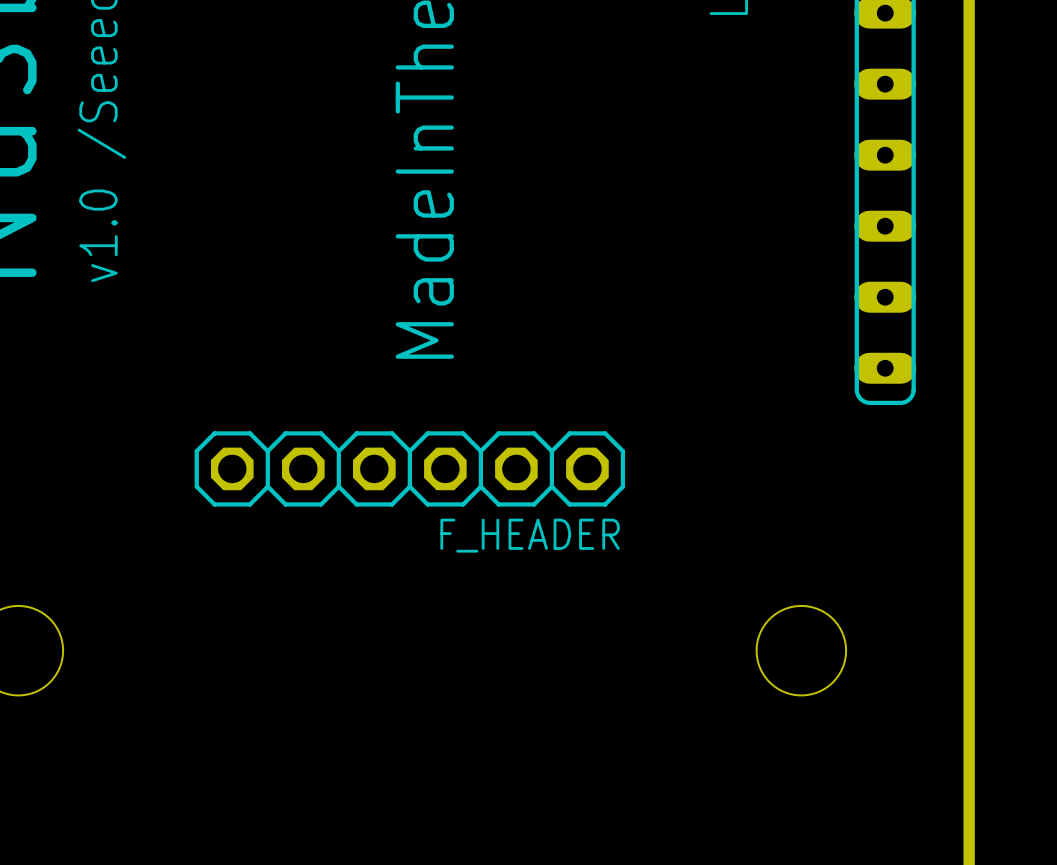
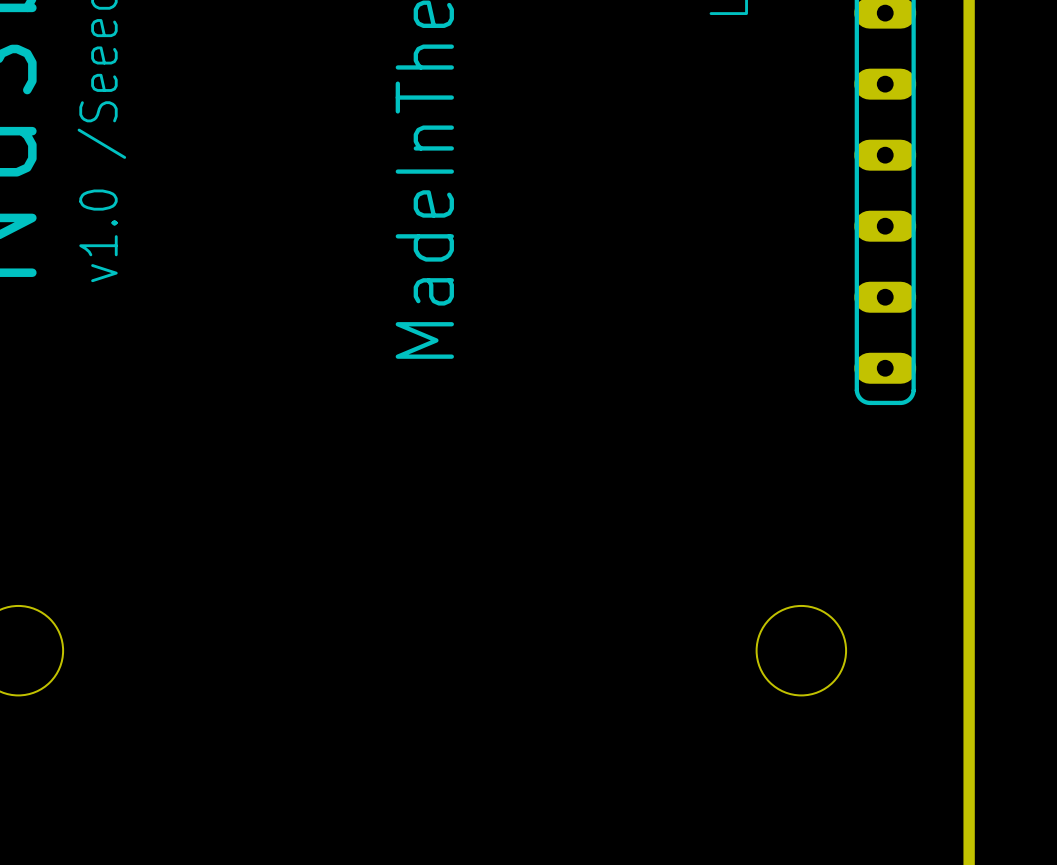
F_HEADER: (409, 468) -> none

